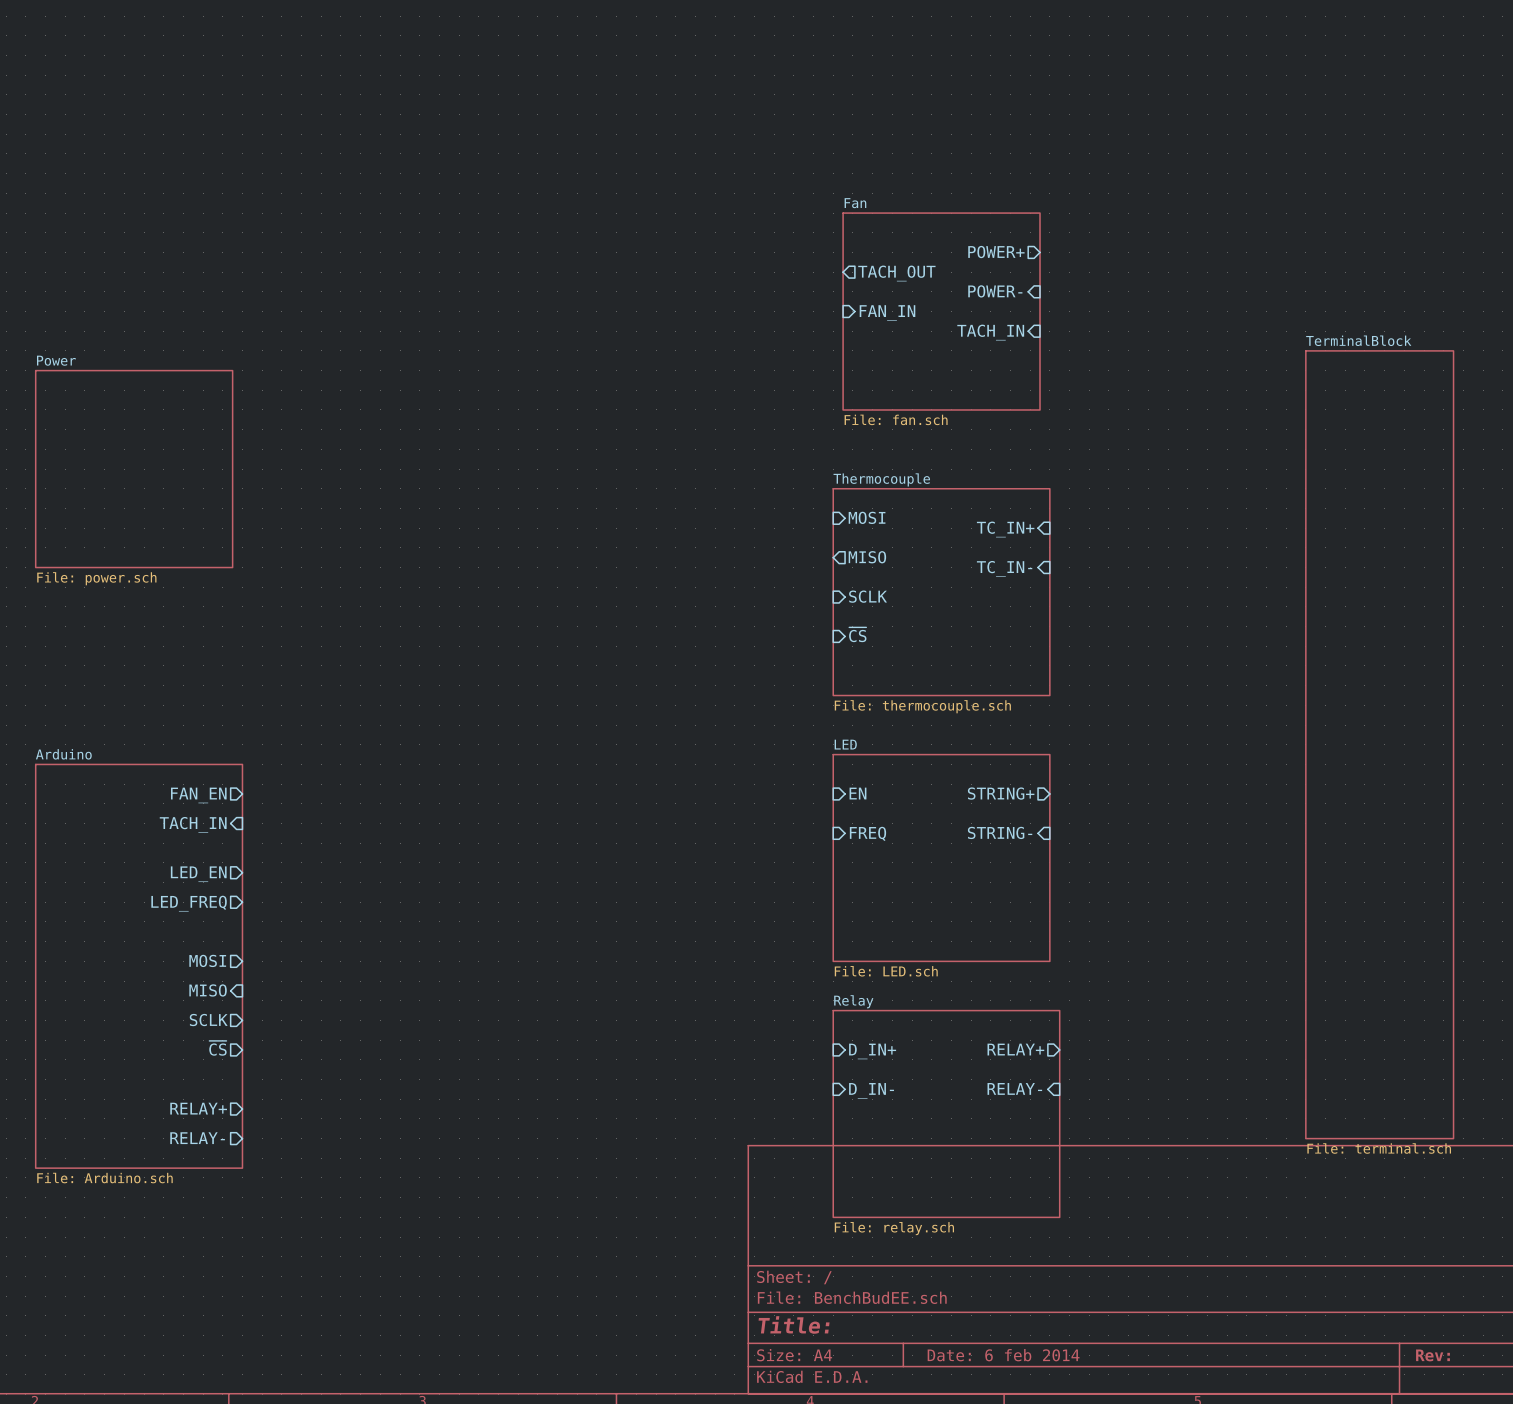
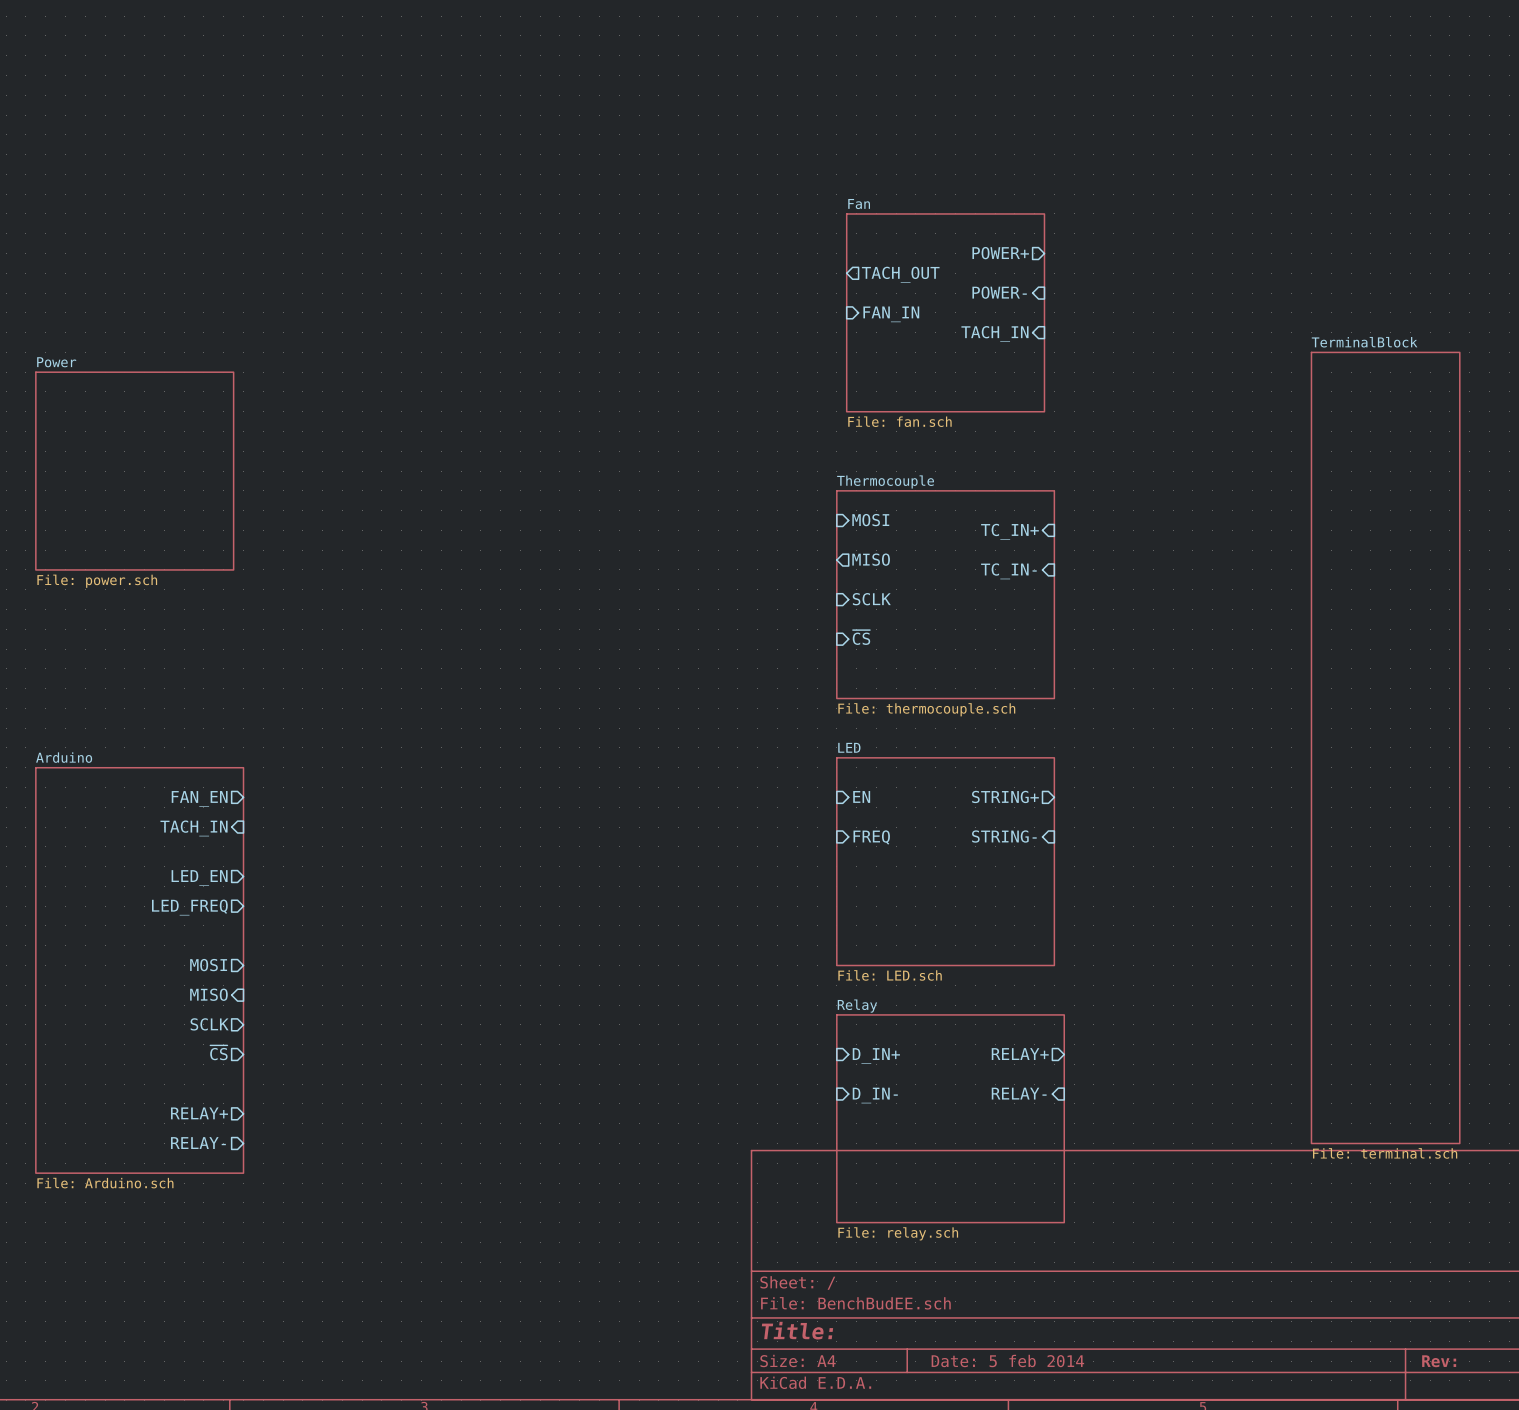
title block: Date: 6 feb 2014 (1003, 1355) -> Date: 5 feb 2014 (1007, 1360)

